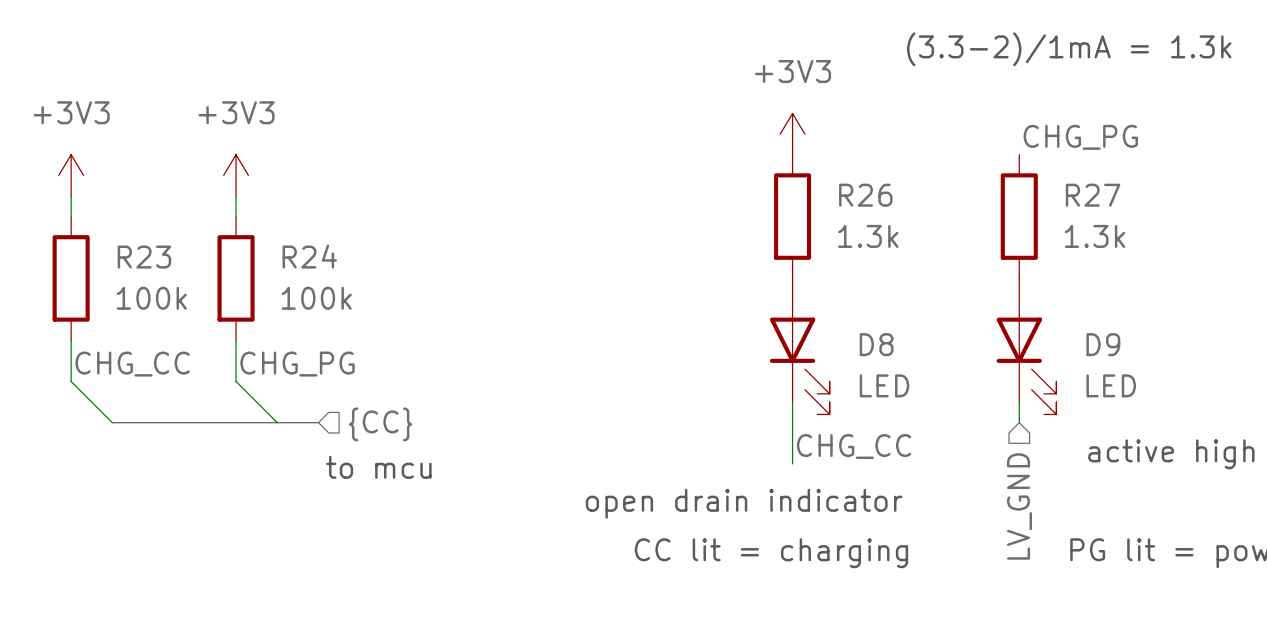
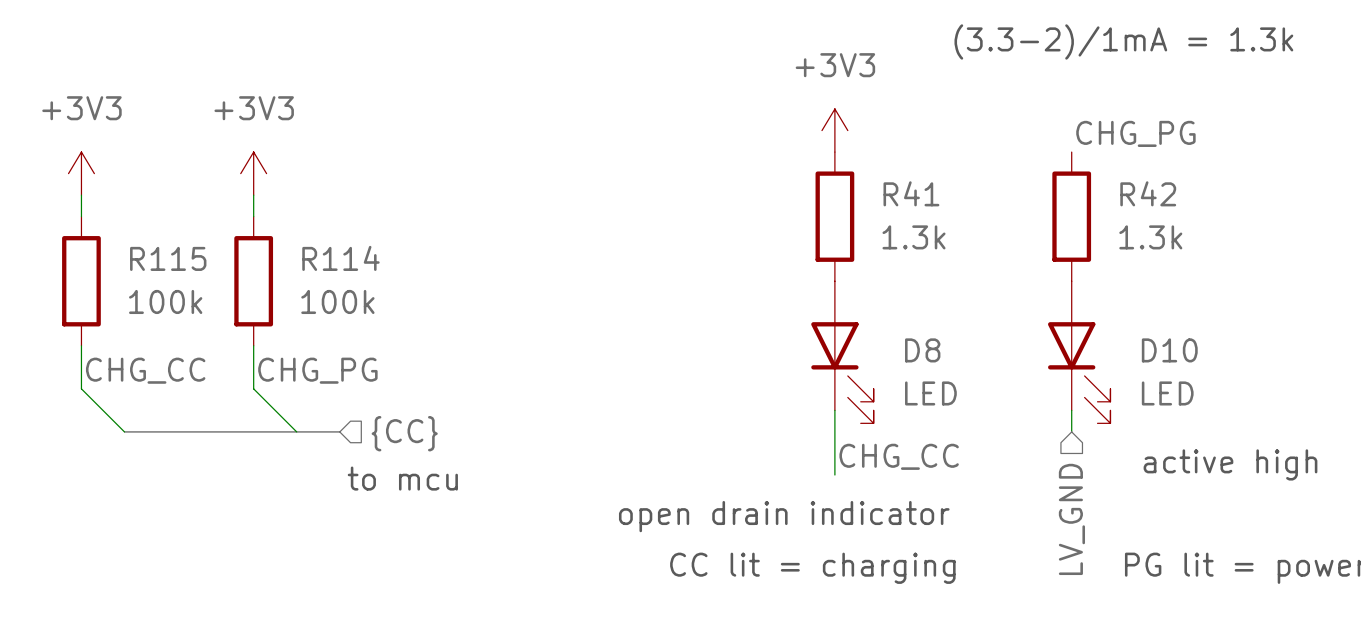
R26 name: R26 (865, 195) -> R41 (911, 193)
R27 name: R27 (1093, 195) -> R42 (1148, 193)
R24 name: R24 (309, 256) -> R114 (340, 258)
R23 name: R23 (144, 257) -> R115 (168, 258)
D9 name: D9 (1103, 344) -> D10 (1169, 350)

